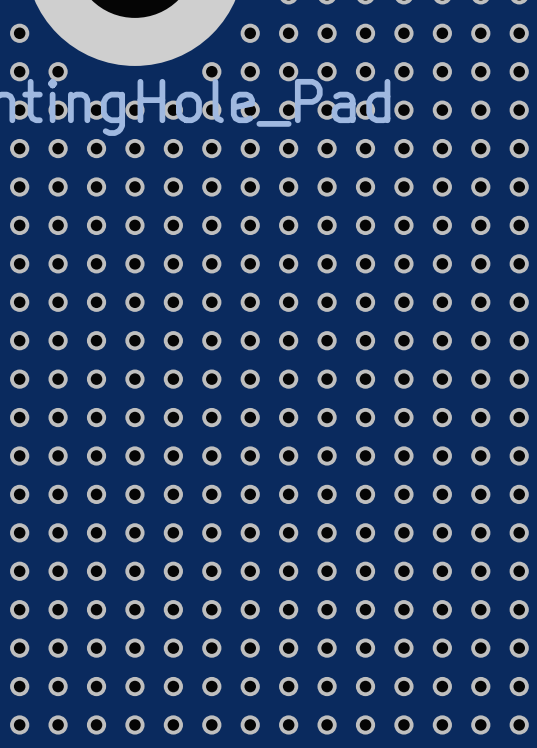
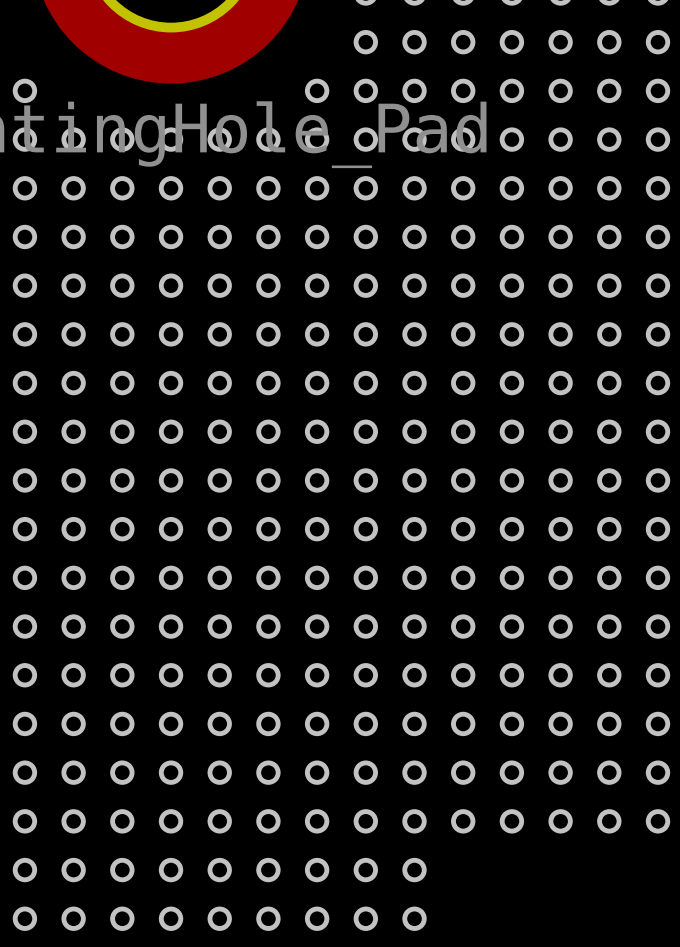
via: (19, 33) -> none
via: (250, 33) -> none
via: (58, 71) -> none
via: (211, 71) -> none
via: (365, 686) -> none
via: (403, 686) -> none
via: (442, 686) -> none
via: (480, 686) -> none
via: (519, 686) -> none
via: (365, 724) -> none
via: (403, 724) -> none
via: (442, 724) -> none
via: (480, 724) -> none
via: (519, 724) -> none

